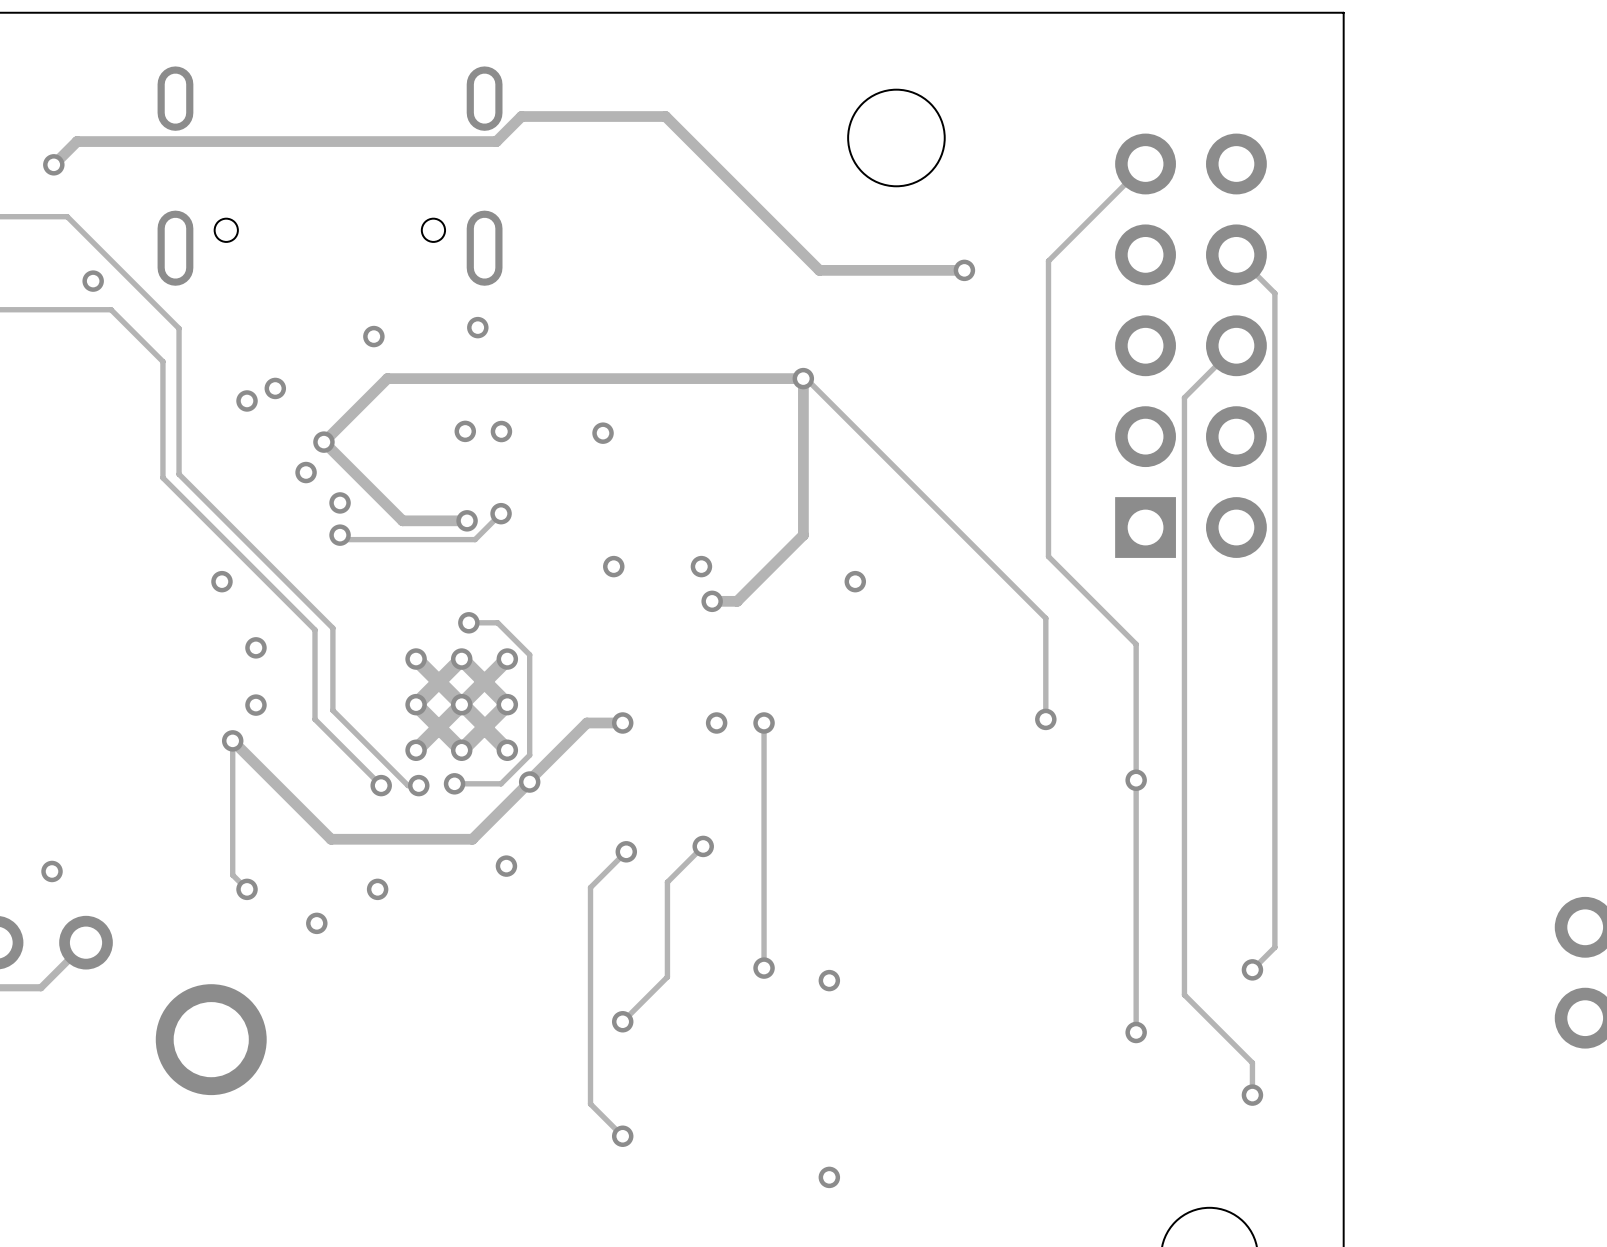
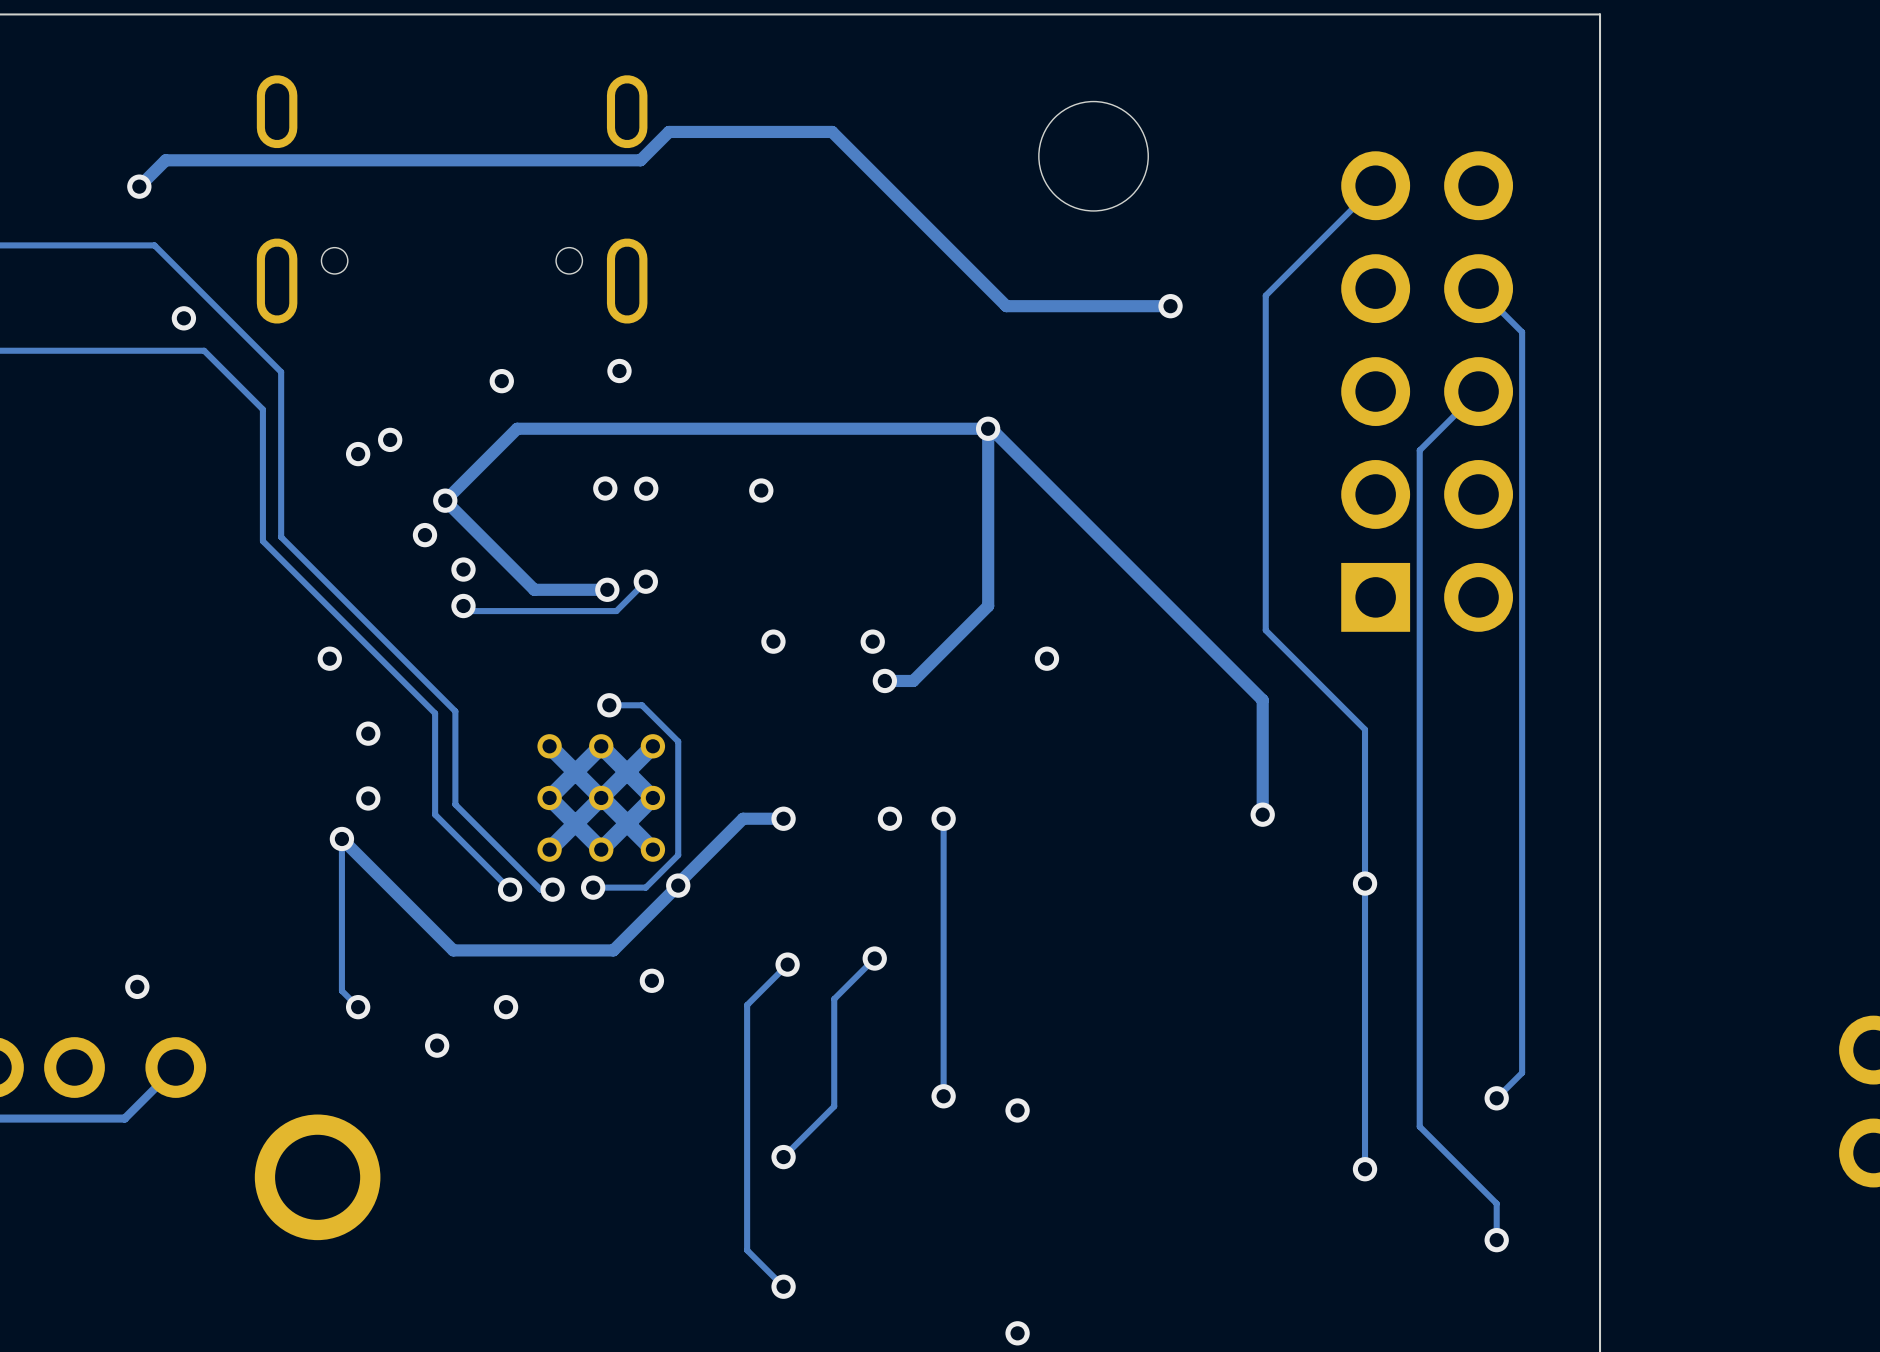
track width: thin (806, 378) (1045, 618) (1045, 719) -> thick (991, 428) (1262, 700) (1262, 814)

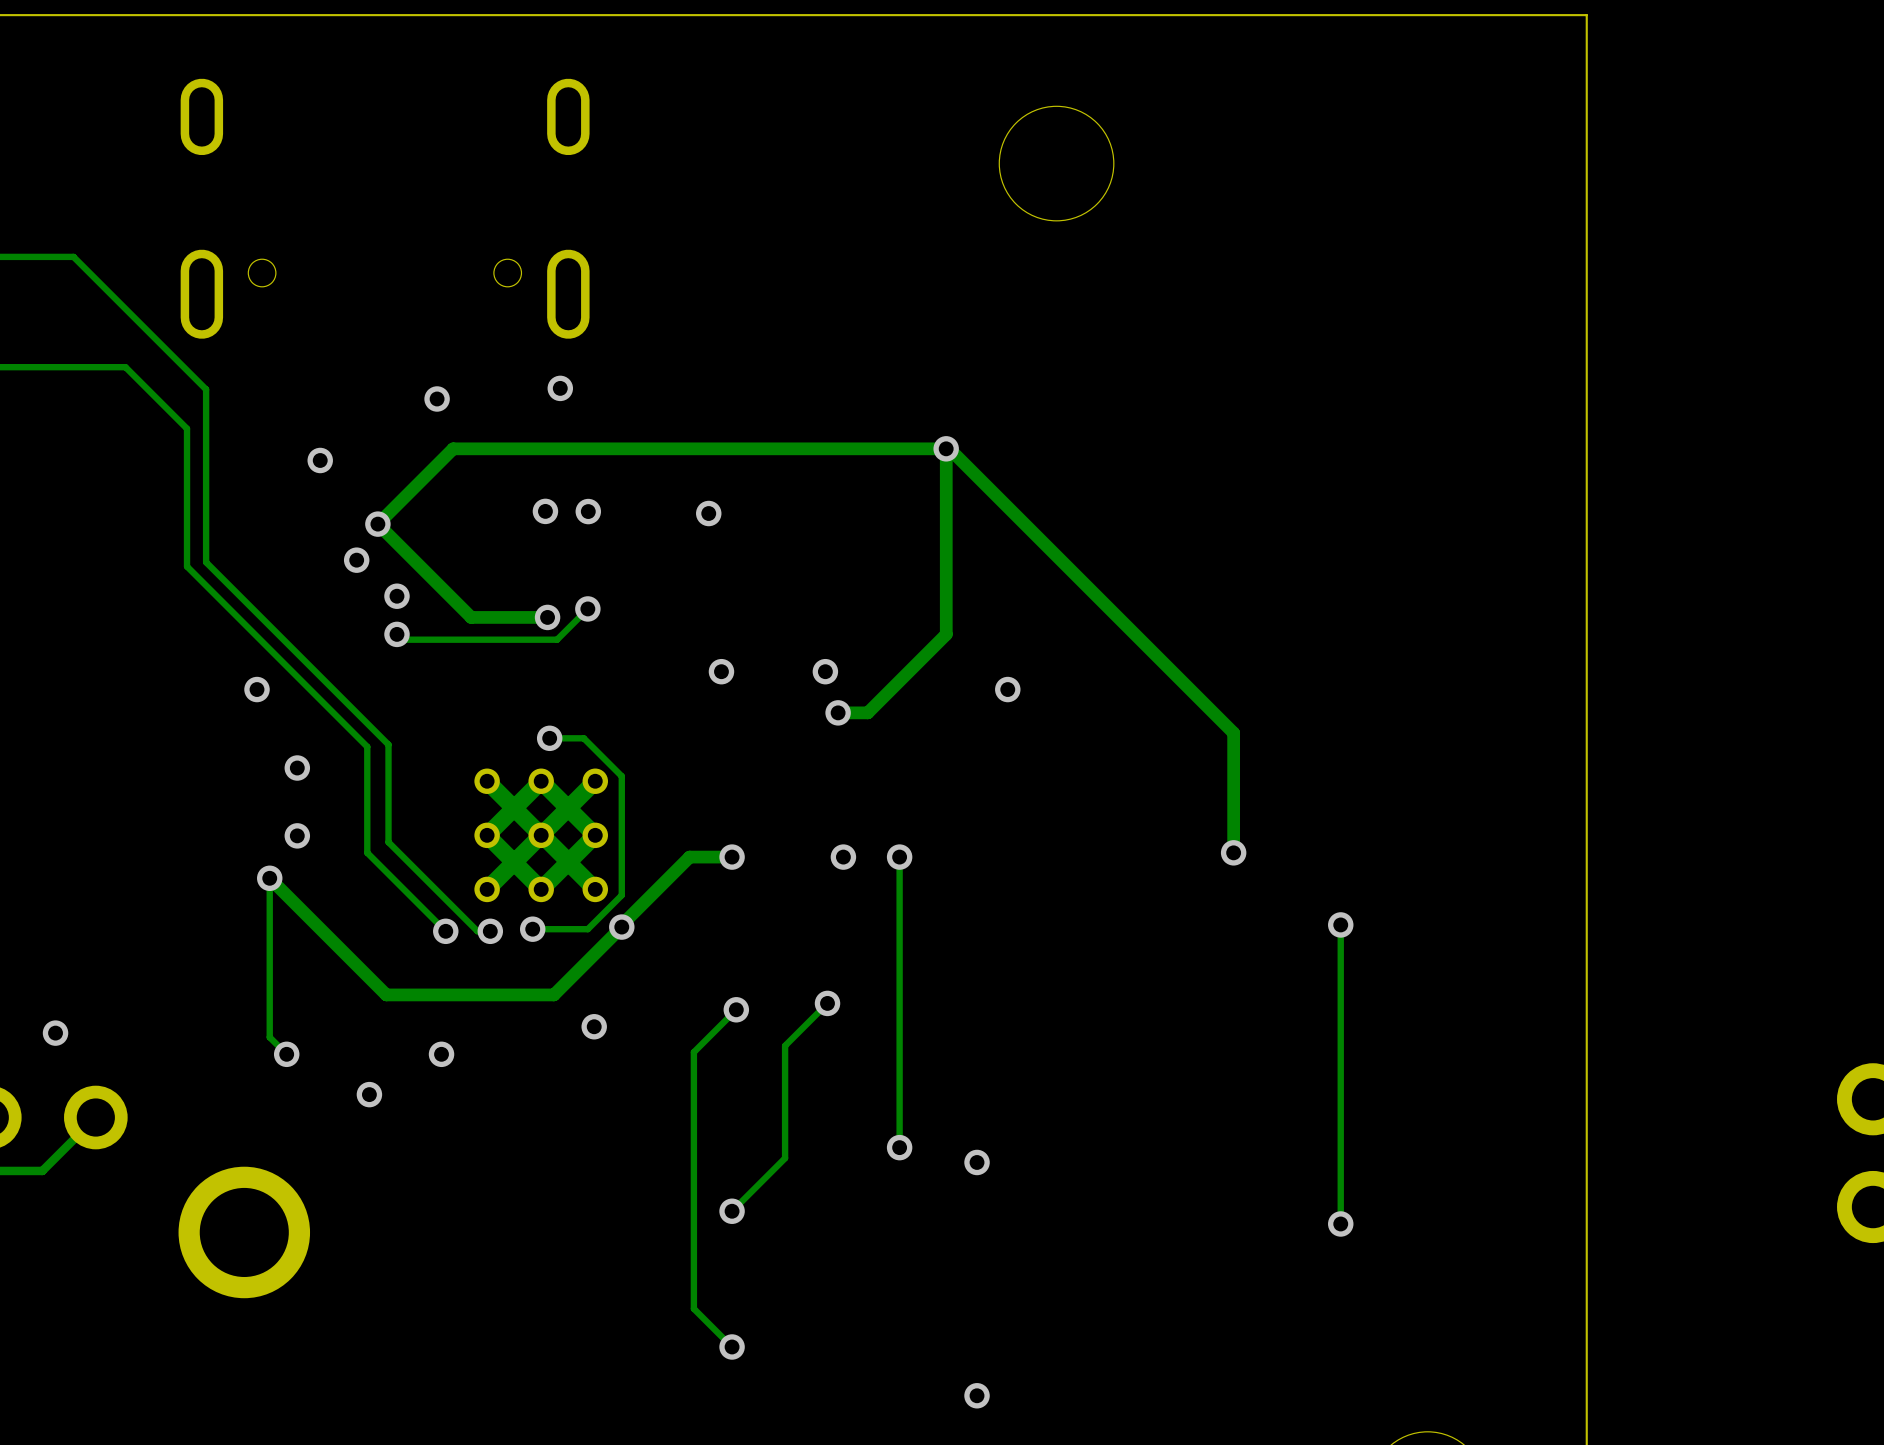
track: (1375, 185) (1265, 295) (1265, 630) (1365, 729) (1365, 883) -> none
track: (139, 186) (165, 160) (640, 160) (668, 131) (832, 131) (1006, 306) (1170, 306) -> none
via: (139, 186) -> none
track: (1478, 288) (1522, 332) (1522, 1072) (1496, 1098) -> none
via: (1170, 306) -> none
via: (183, 318) -> none
part: (1427, 391) -> none
track: (1478, 391) (1419, 450) (1419, 1126) (1496, 1203) (1496, 1240) -> none
via: (358, 454) -> none
via: (1496, 1098) -> none
via: (1496, 1240) -> none

